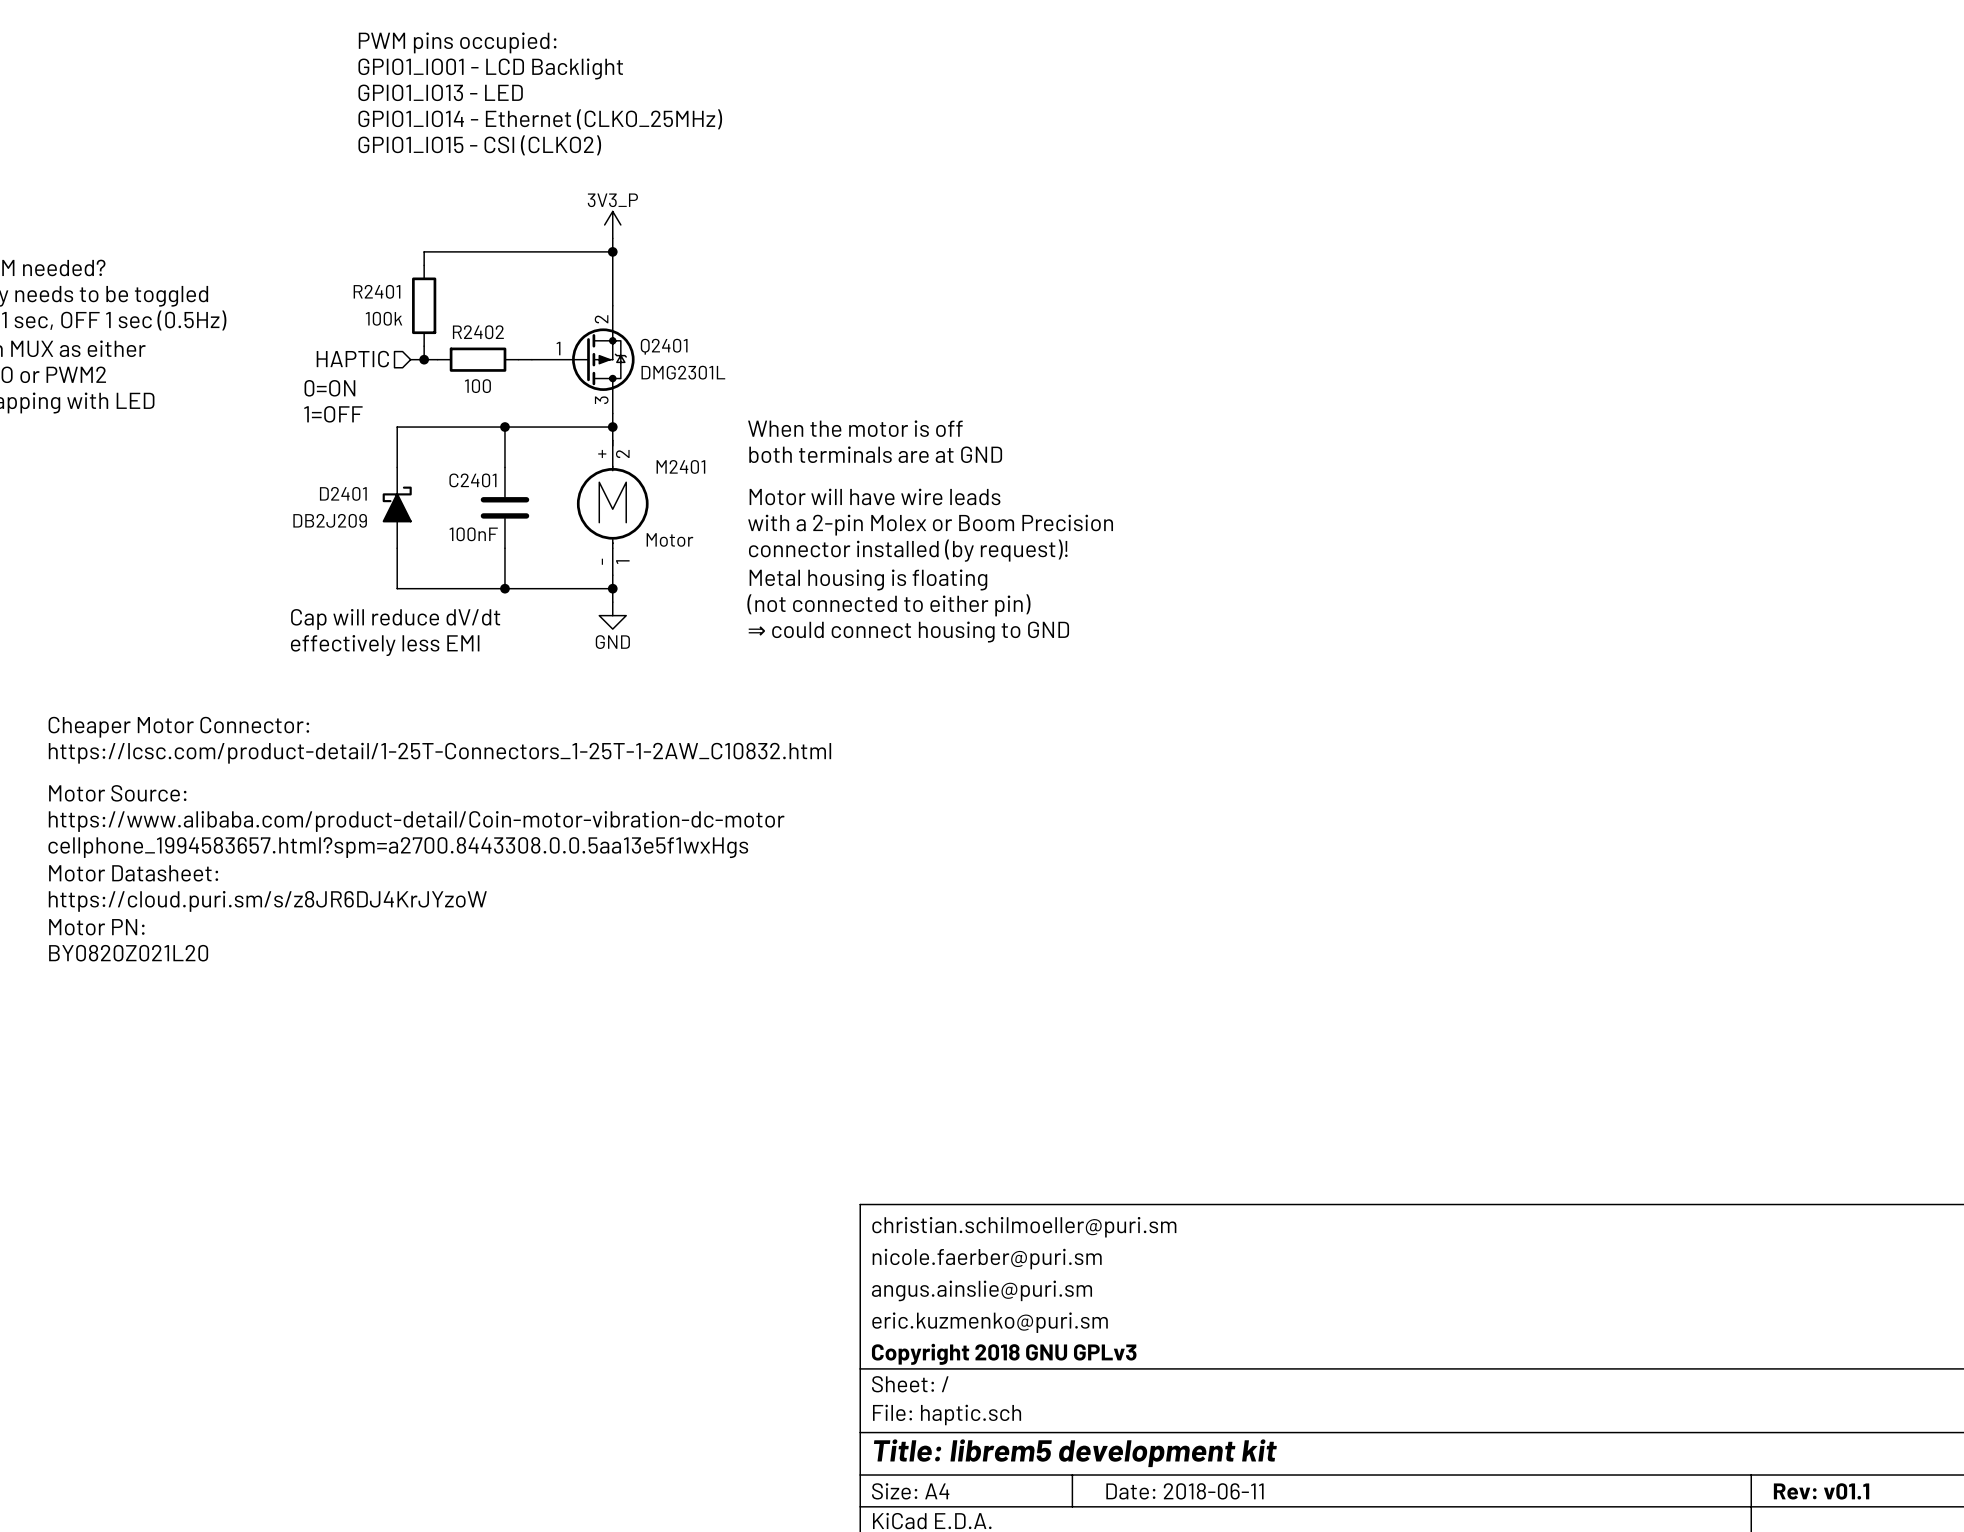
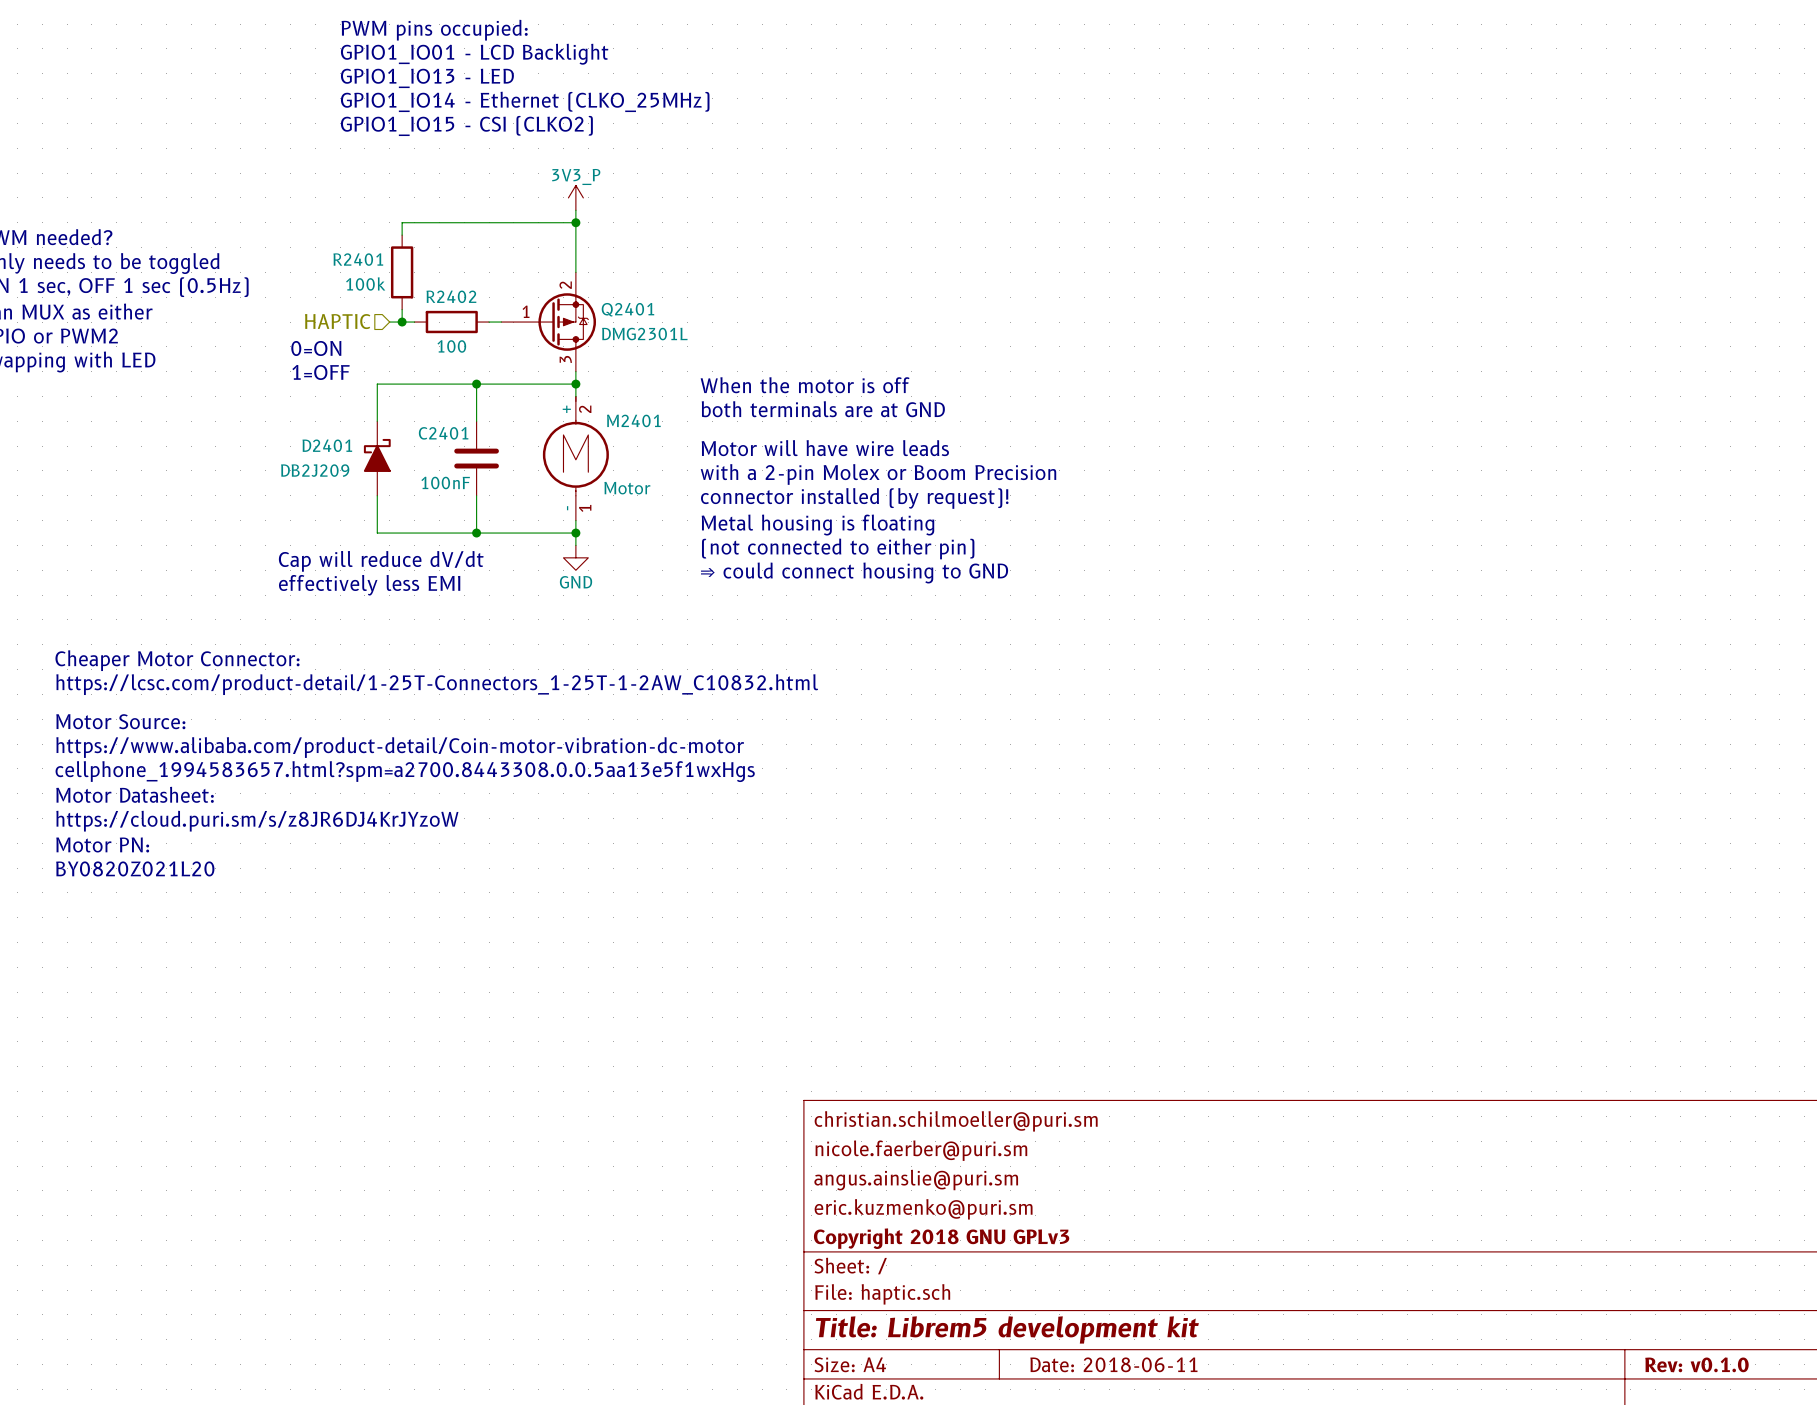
title block: Title: librem5 development kit (1075, 1453) -> Title: Librem5 development kit (1007, 1329)
title block: Rev: v01.1 (1821, 1491) -> Rev: v0.1.0 (1696, 1364)

